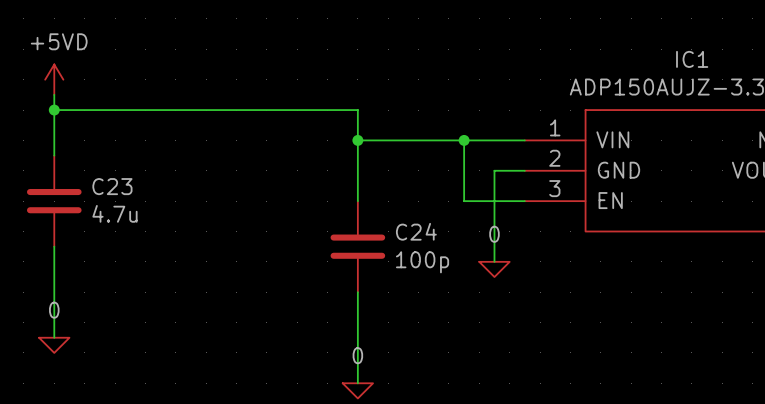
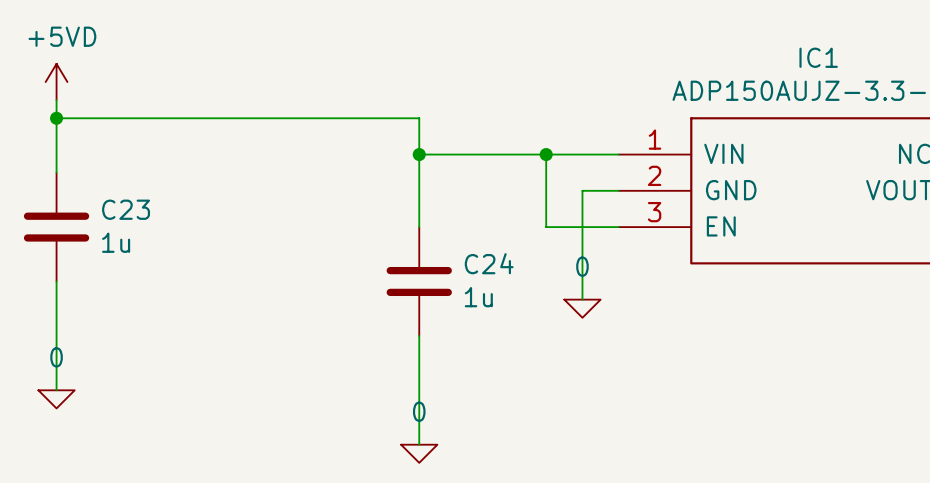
C23 value: 4.7u (114, 213) -> 1u (116, 242)
C24 value: 100p (422, 262) -> 1u (478, 297)

